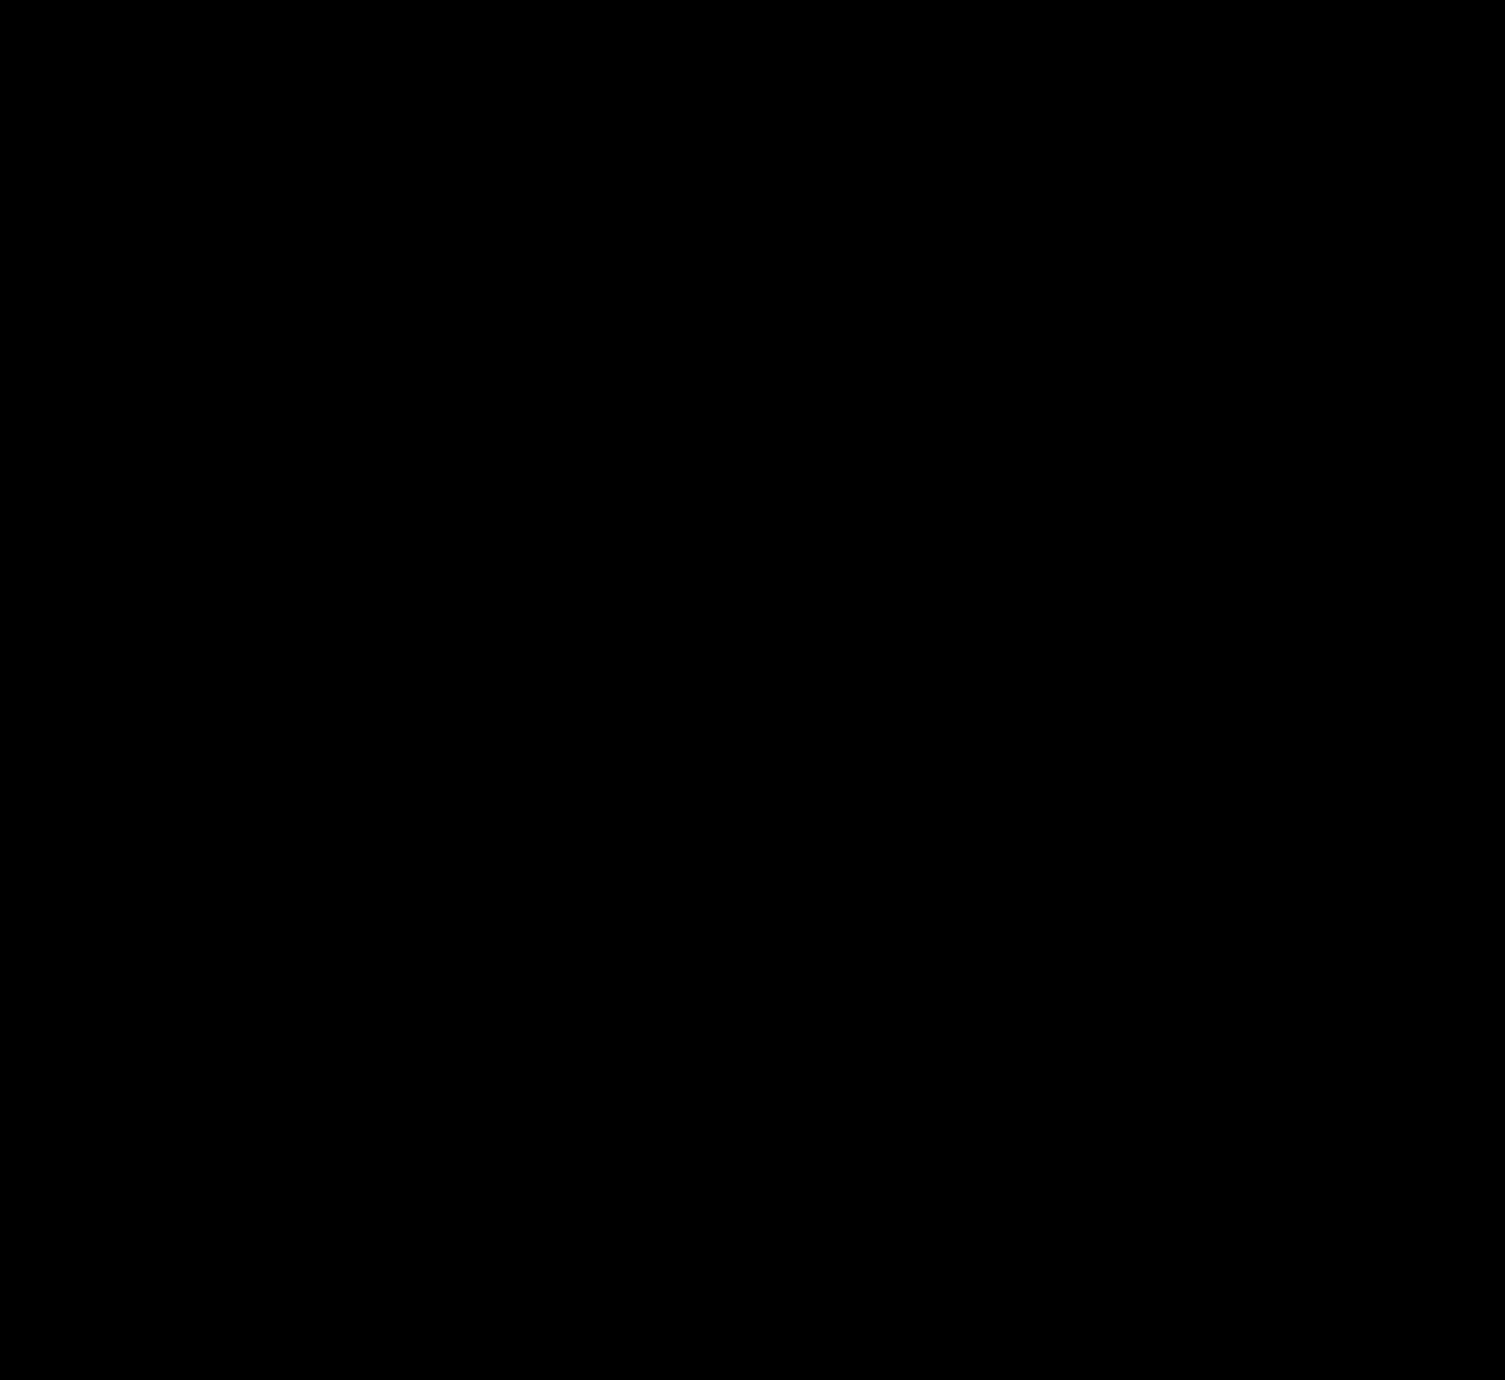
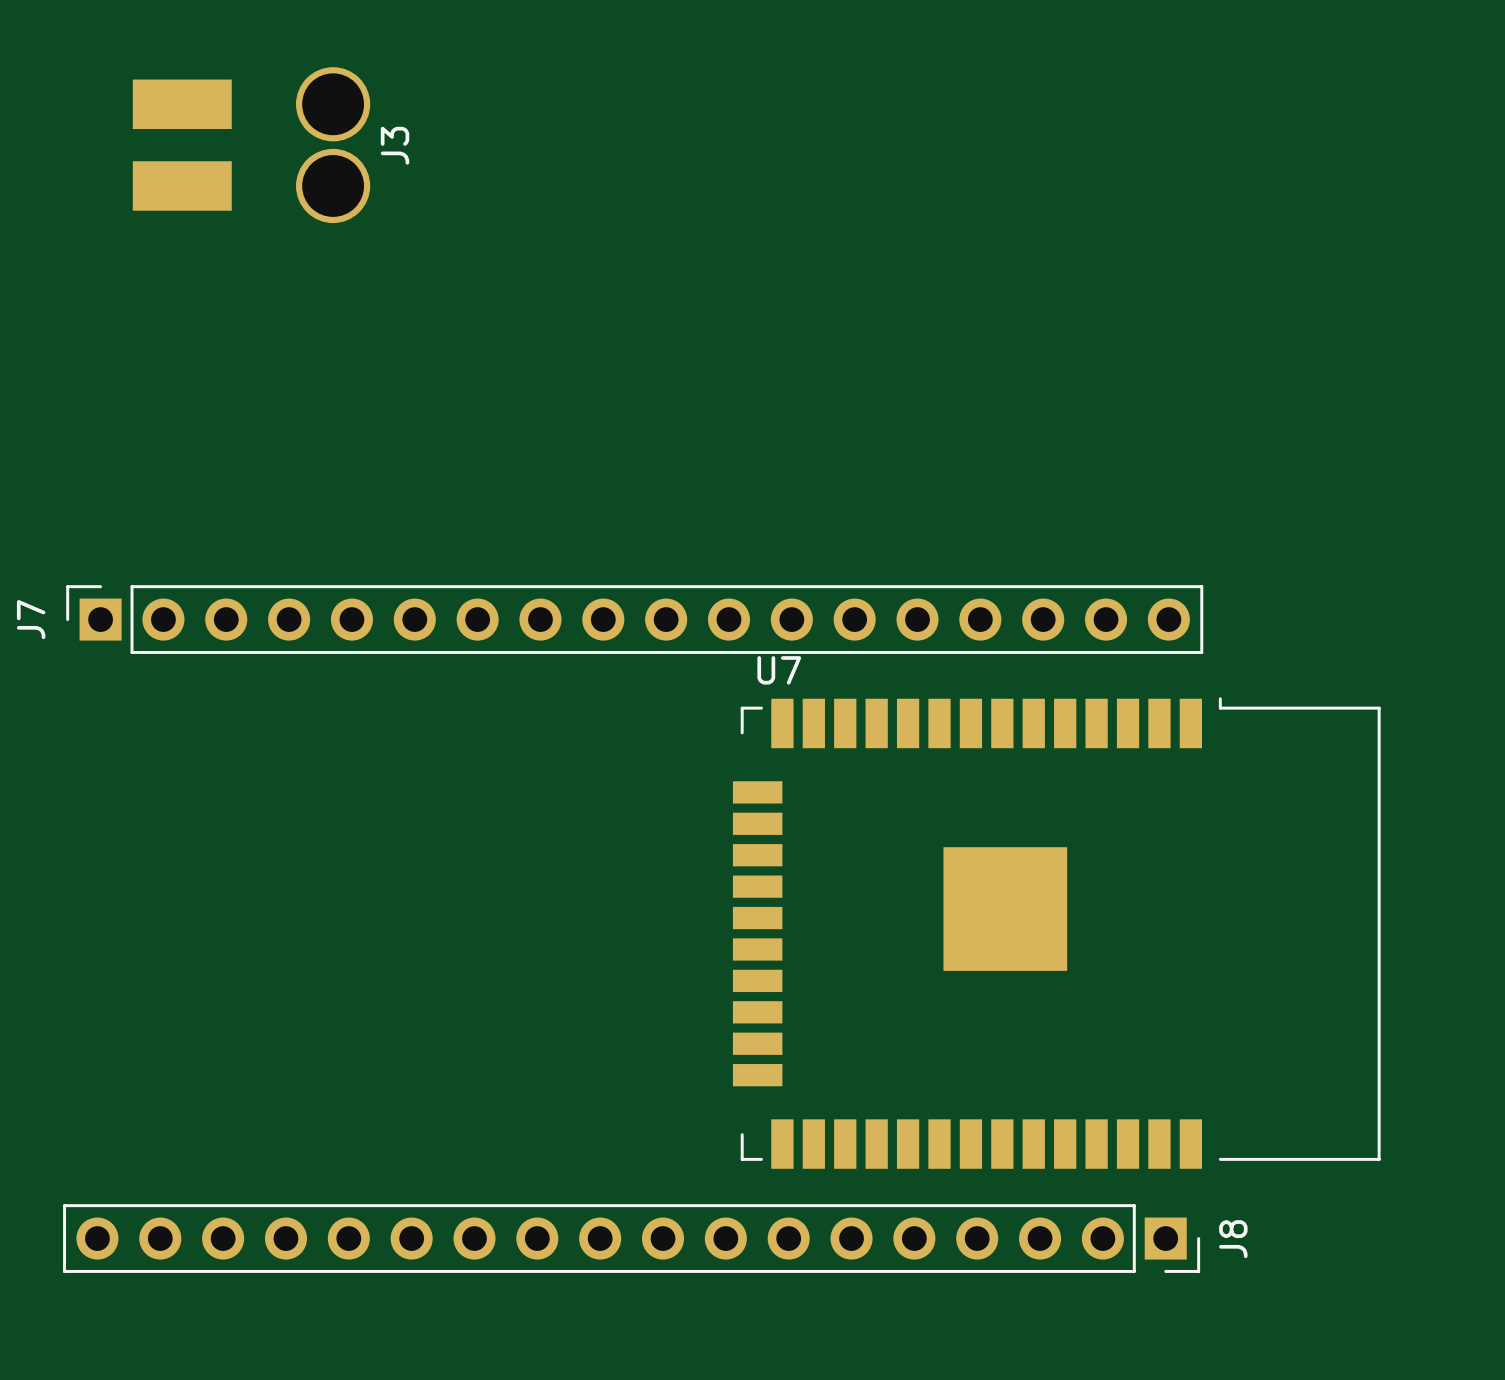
J3: none -> (251, 145)
J7: none -> (634, 619)
U7: none -> (1056, 933)
J8: none -> (631, 1238)

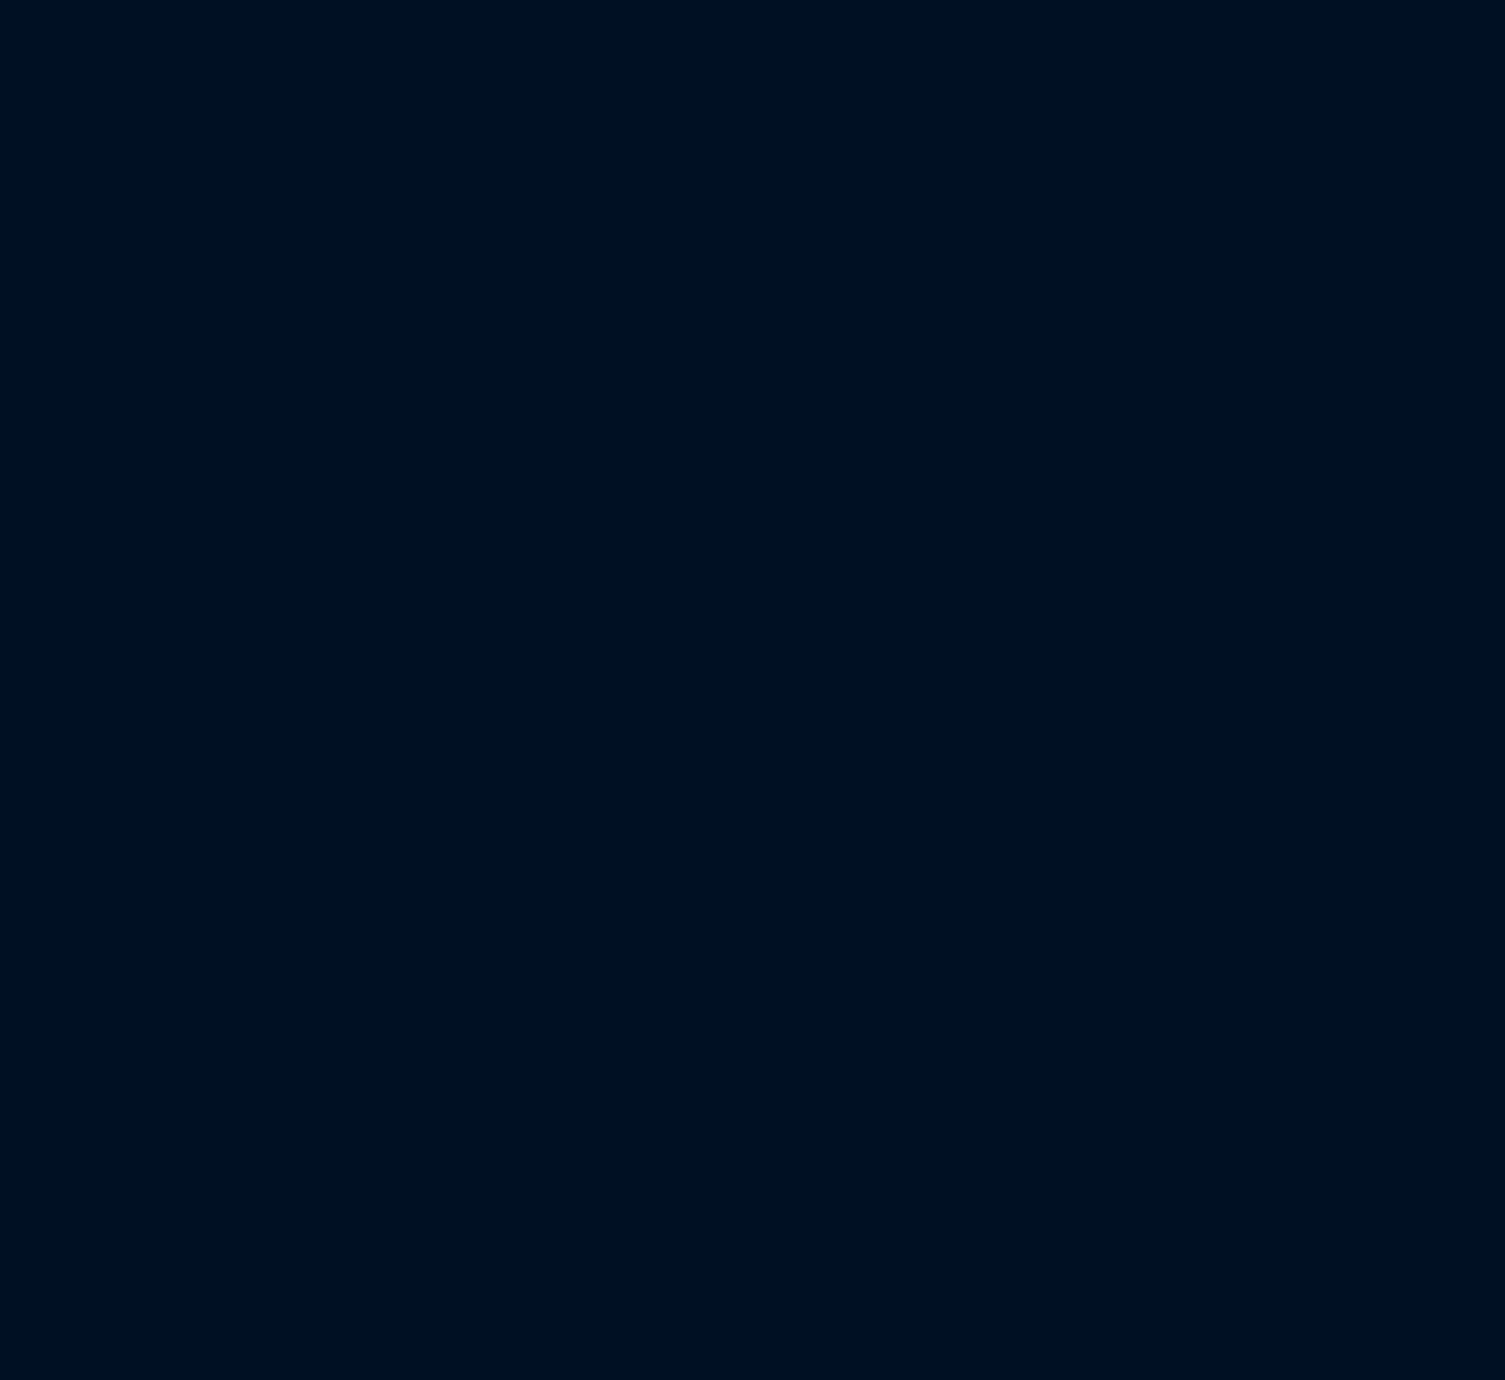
J3: (251, 145) -> none
J7: (634, 619) -> none
U7: (1056, 933) -> none
J8: (631, 1238) -> none

